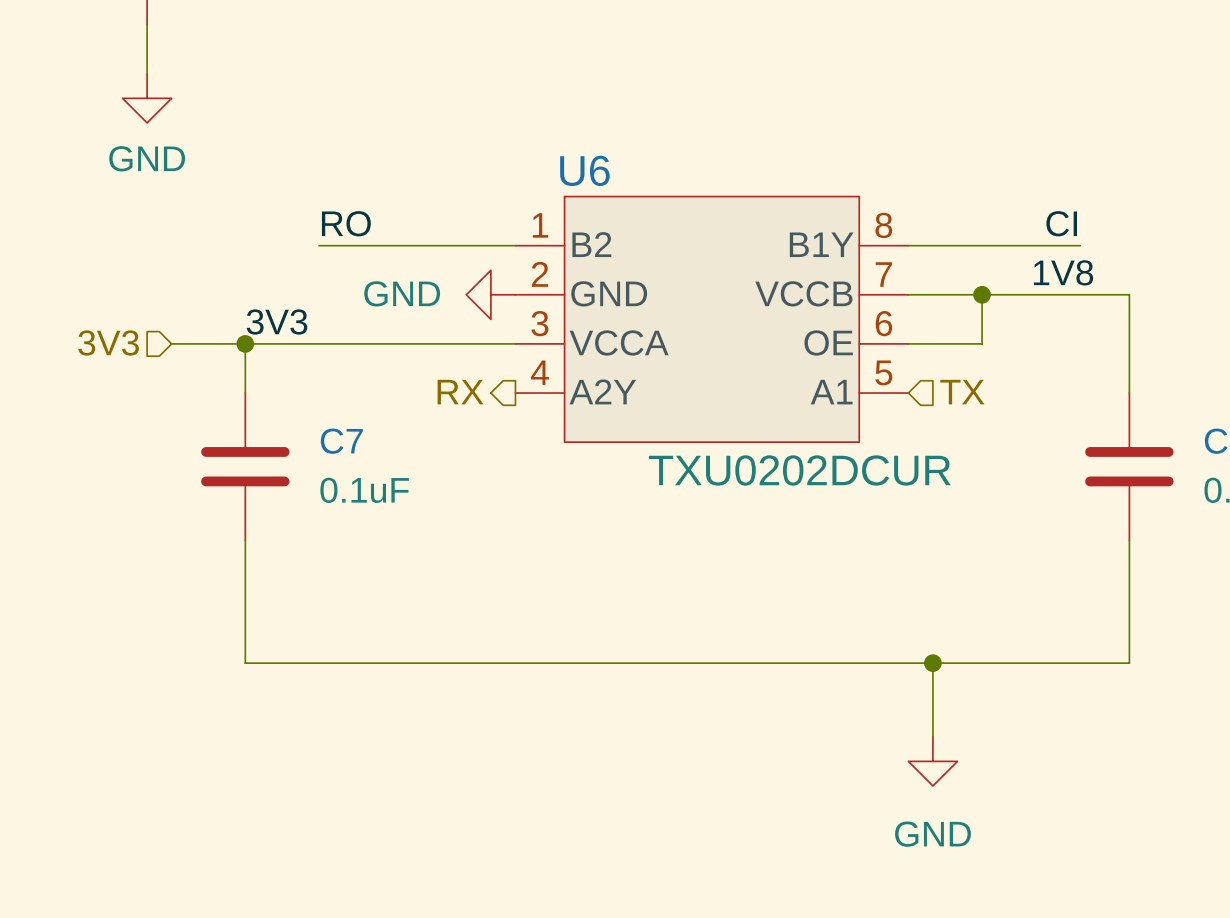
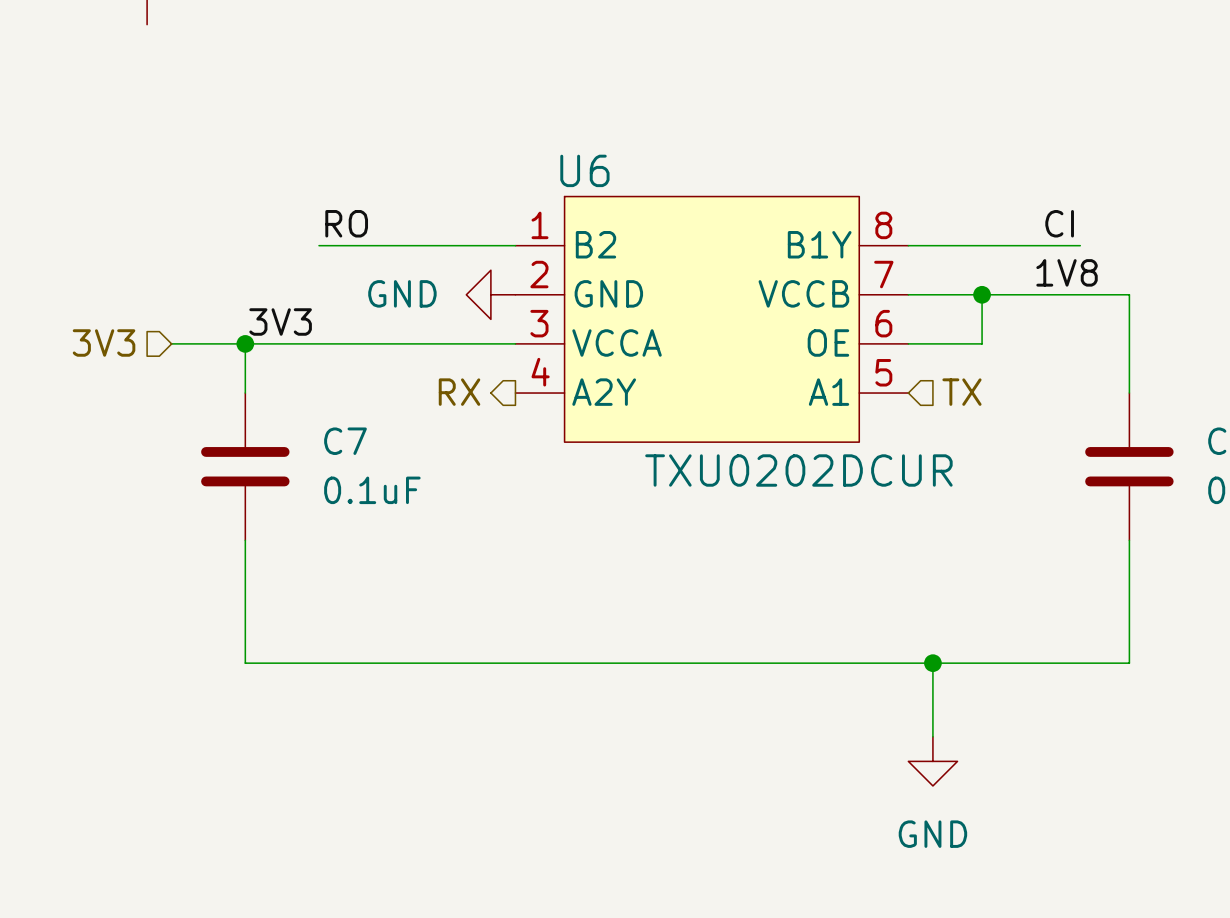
wire: (147, 24) (147, 73) -> none
power symbol: GND (147, 98) -> none

